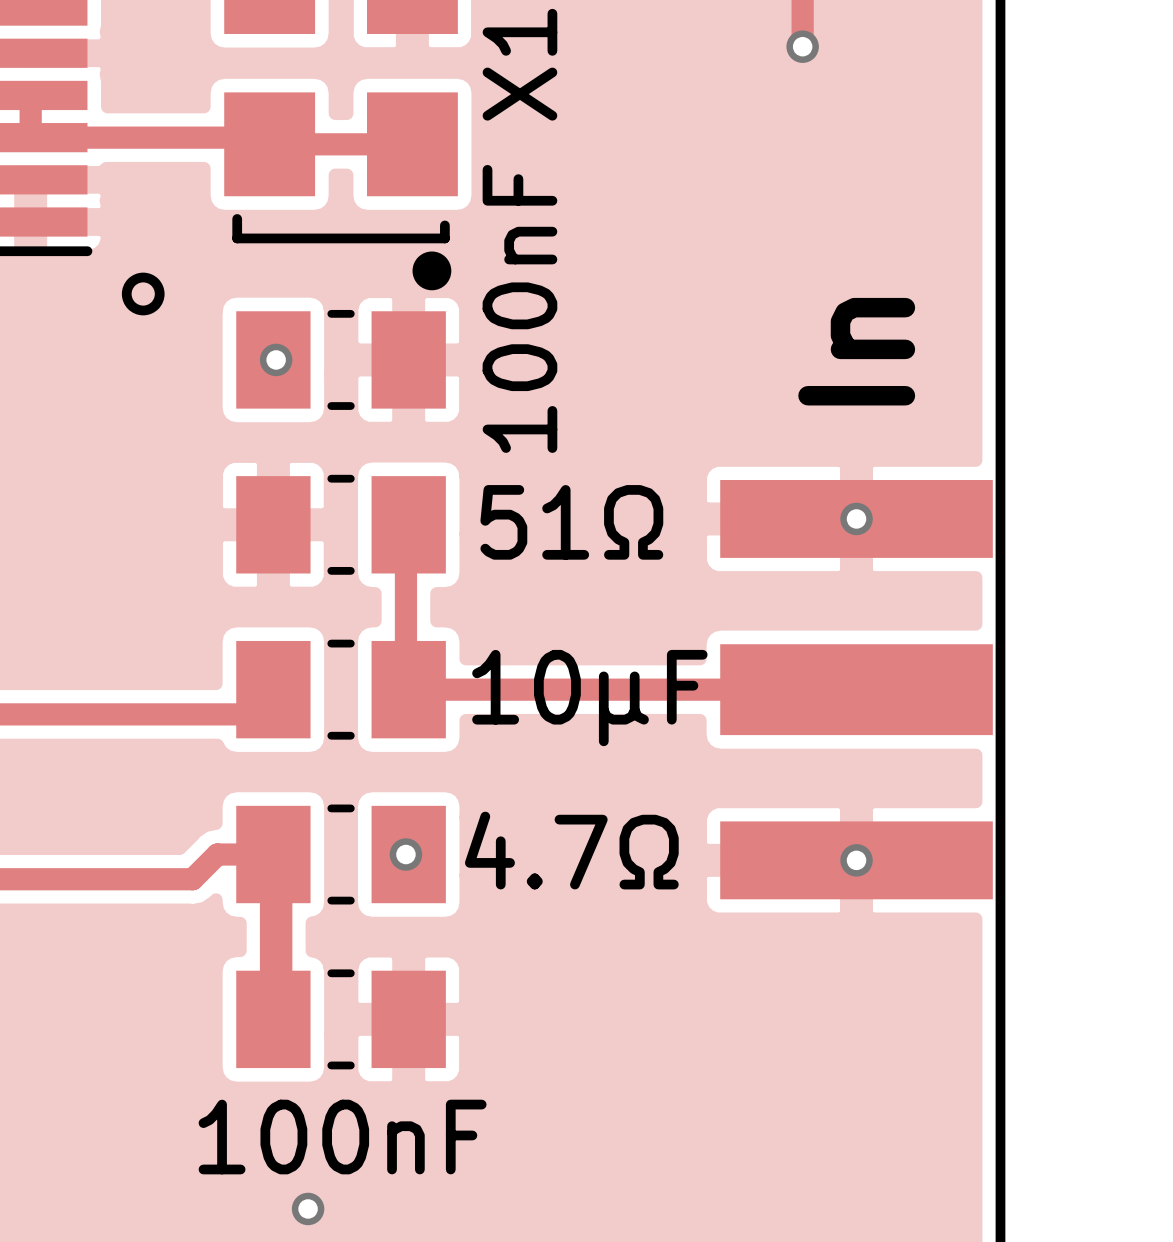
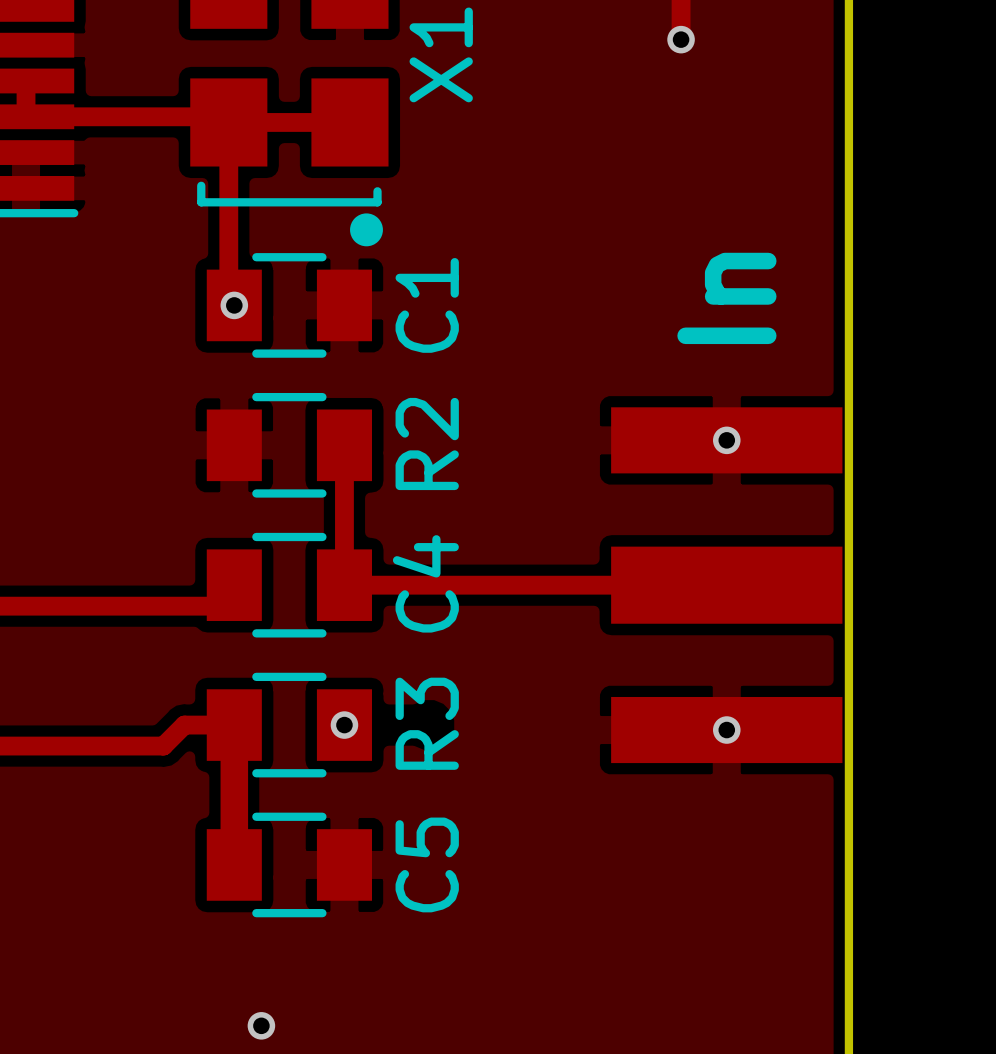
track: none -> (228, 122) (228, 299)
drawing: [121, 272, 165, 316] -> none
part: 100nF (341, 359) -> none
C1: none -> (289, 305)
part: 51Ω (341, 524) -> none
R2: none -> (289, 445)
part: 10µF (341, 689) -> none
C4: none -> (289, 585)
part: 4.7Ω (341, 854) -> none
R3: none -> (289, 725)
part: 100nF (341, 1019) -> none
C5: none -> (289, 864)

